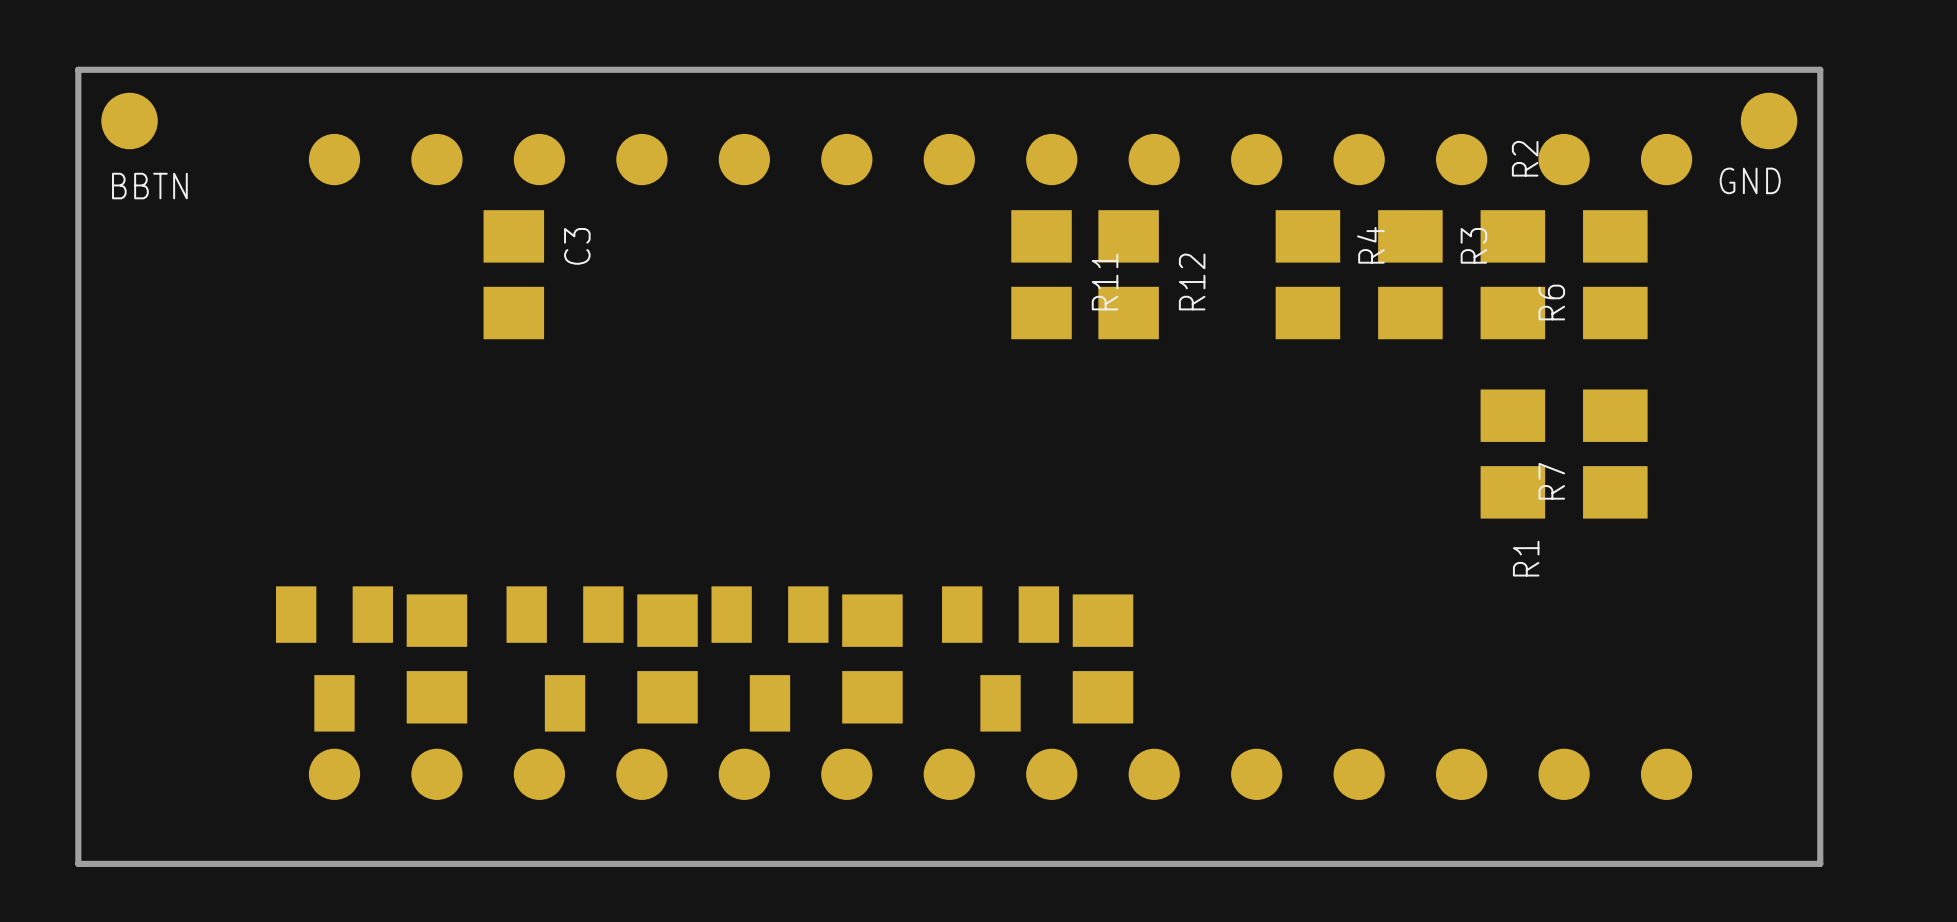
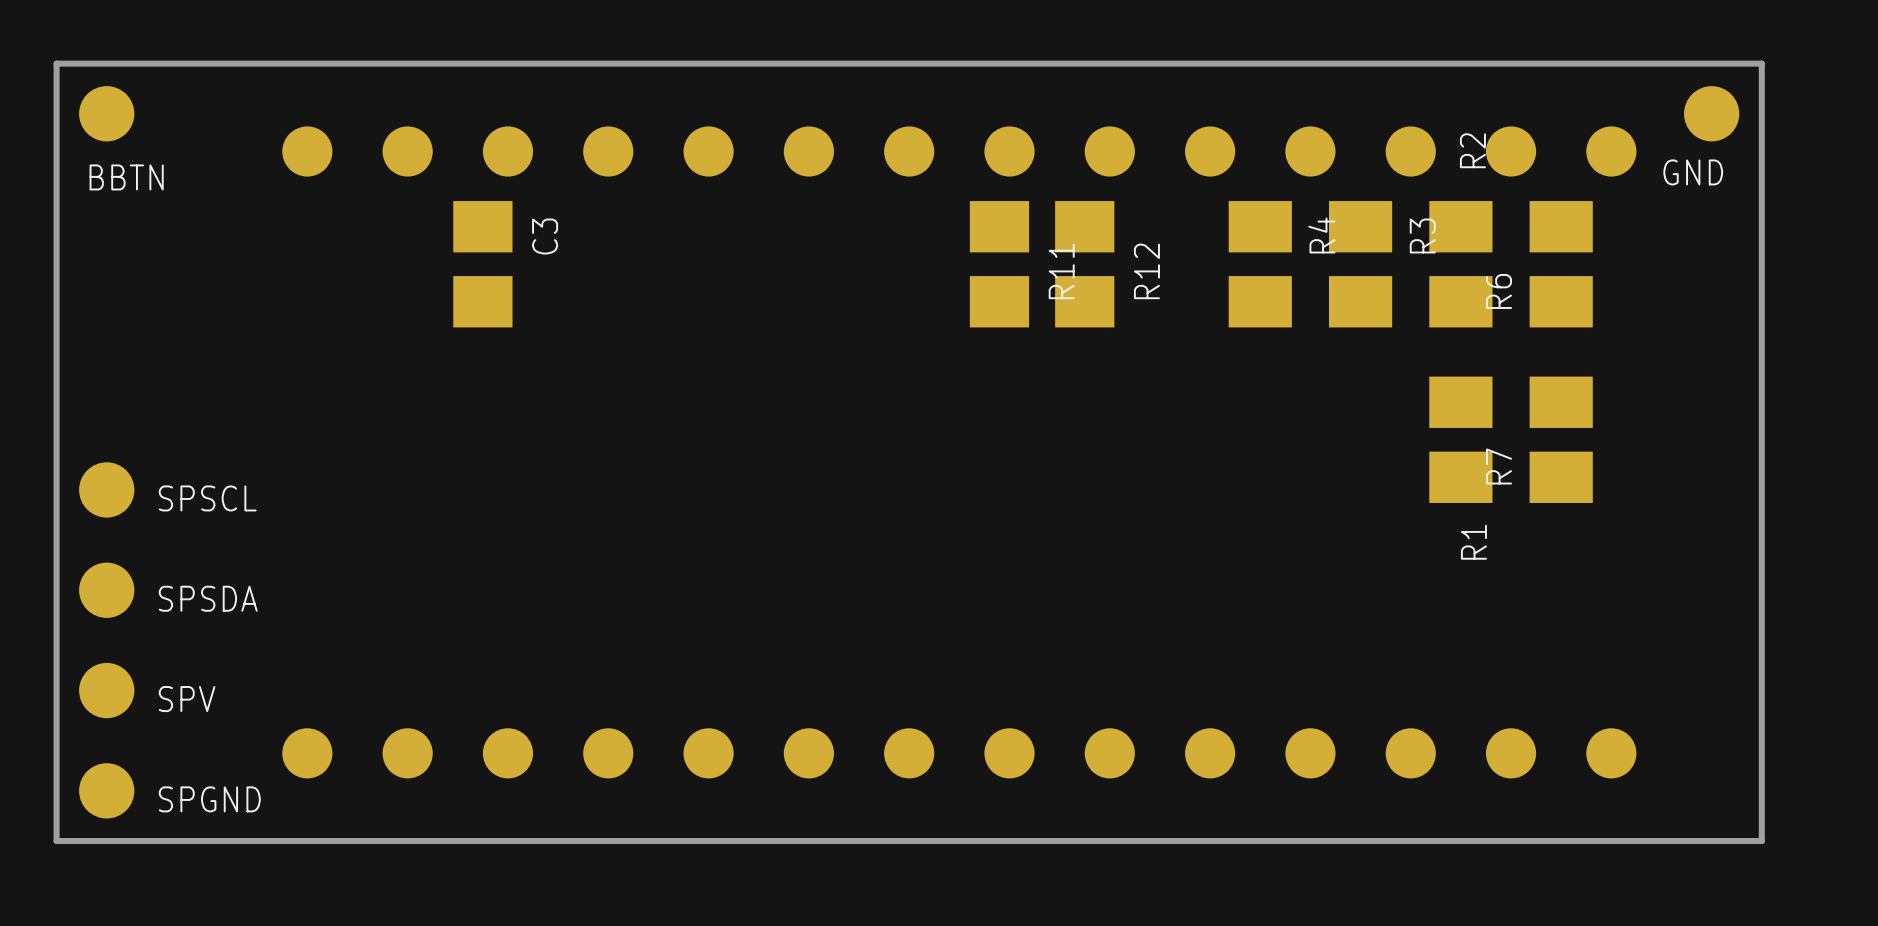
SPSCL: none -> (106, 489)
SPSDA: none -> (106, 590)
part: (334, 658) -> none
part: (436, 658) -> none
part: (565, 658) -> none
part: (667, 658) -> none
part: (769, 658) -> none
part: (872, 658) -> none
part: (1000, 658) -> none
part: (1102, 658) -> none
SPV: none -> (106, 690)
SPGND: none -> (106, 790)

